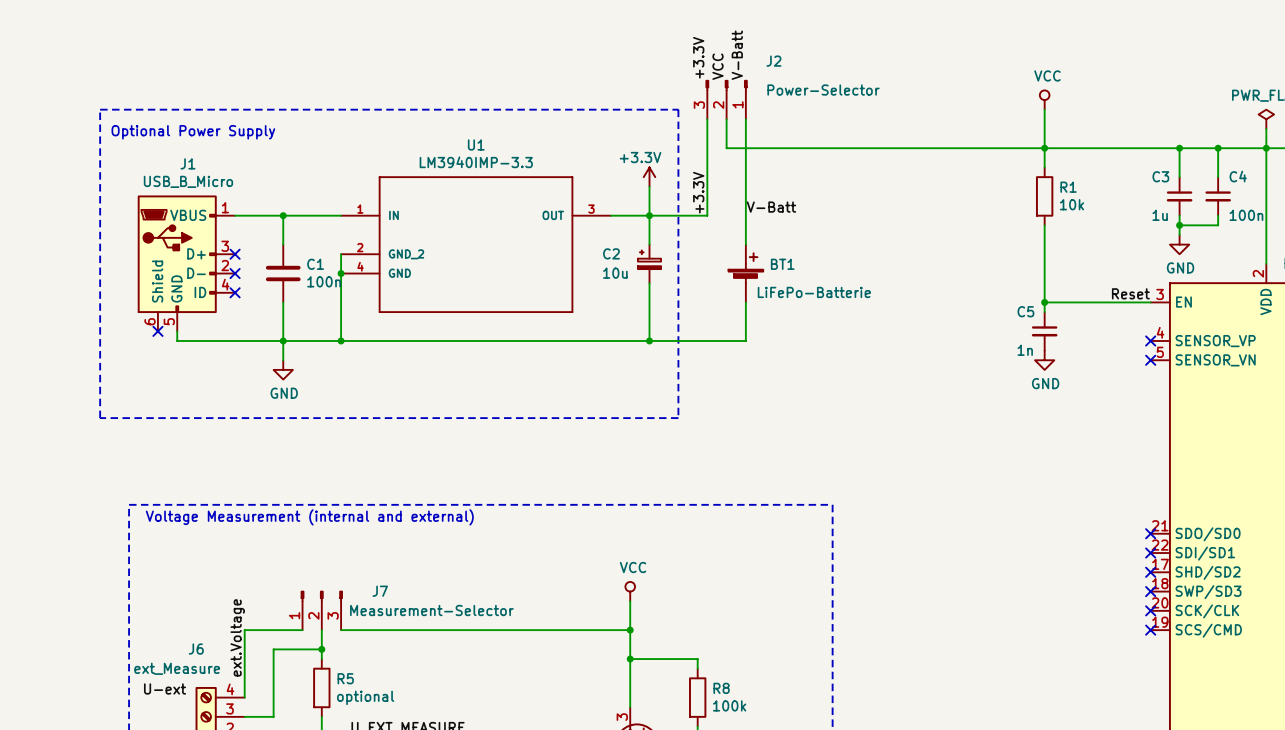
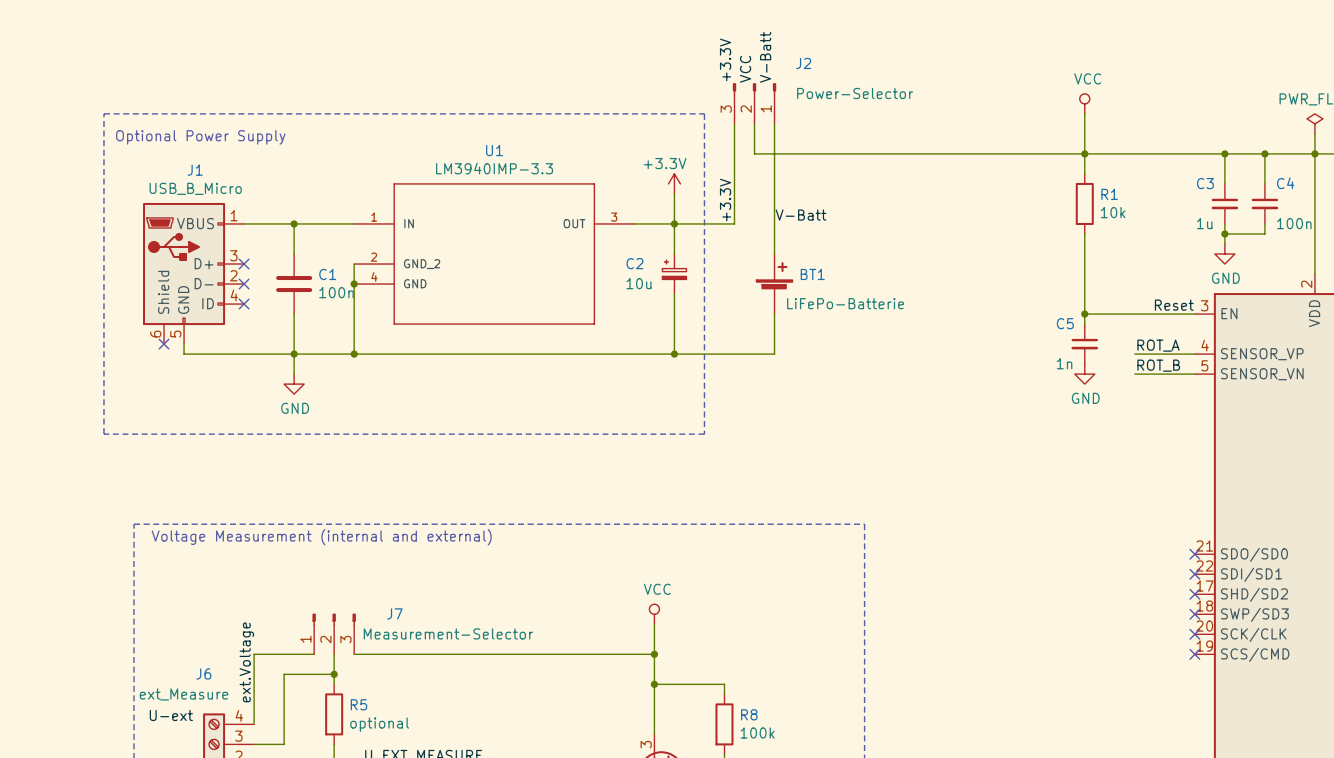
label: none -> ROT_A (1158, 345)
wire: none -> (1134, 354) (1194, 354)
no-connect mark: (1150, 340) -> none
label: none -> ROT_B (1158, 365)
wire: none -> (1134, 374) (1194, 374)
no-connect mark: (1150, 360) -> none

